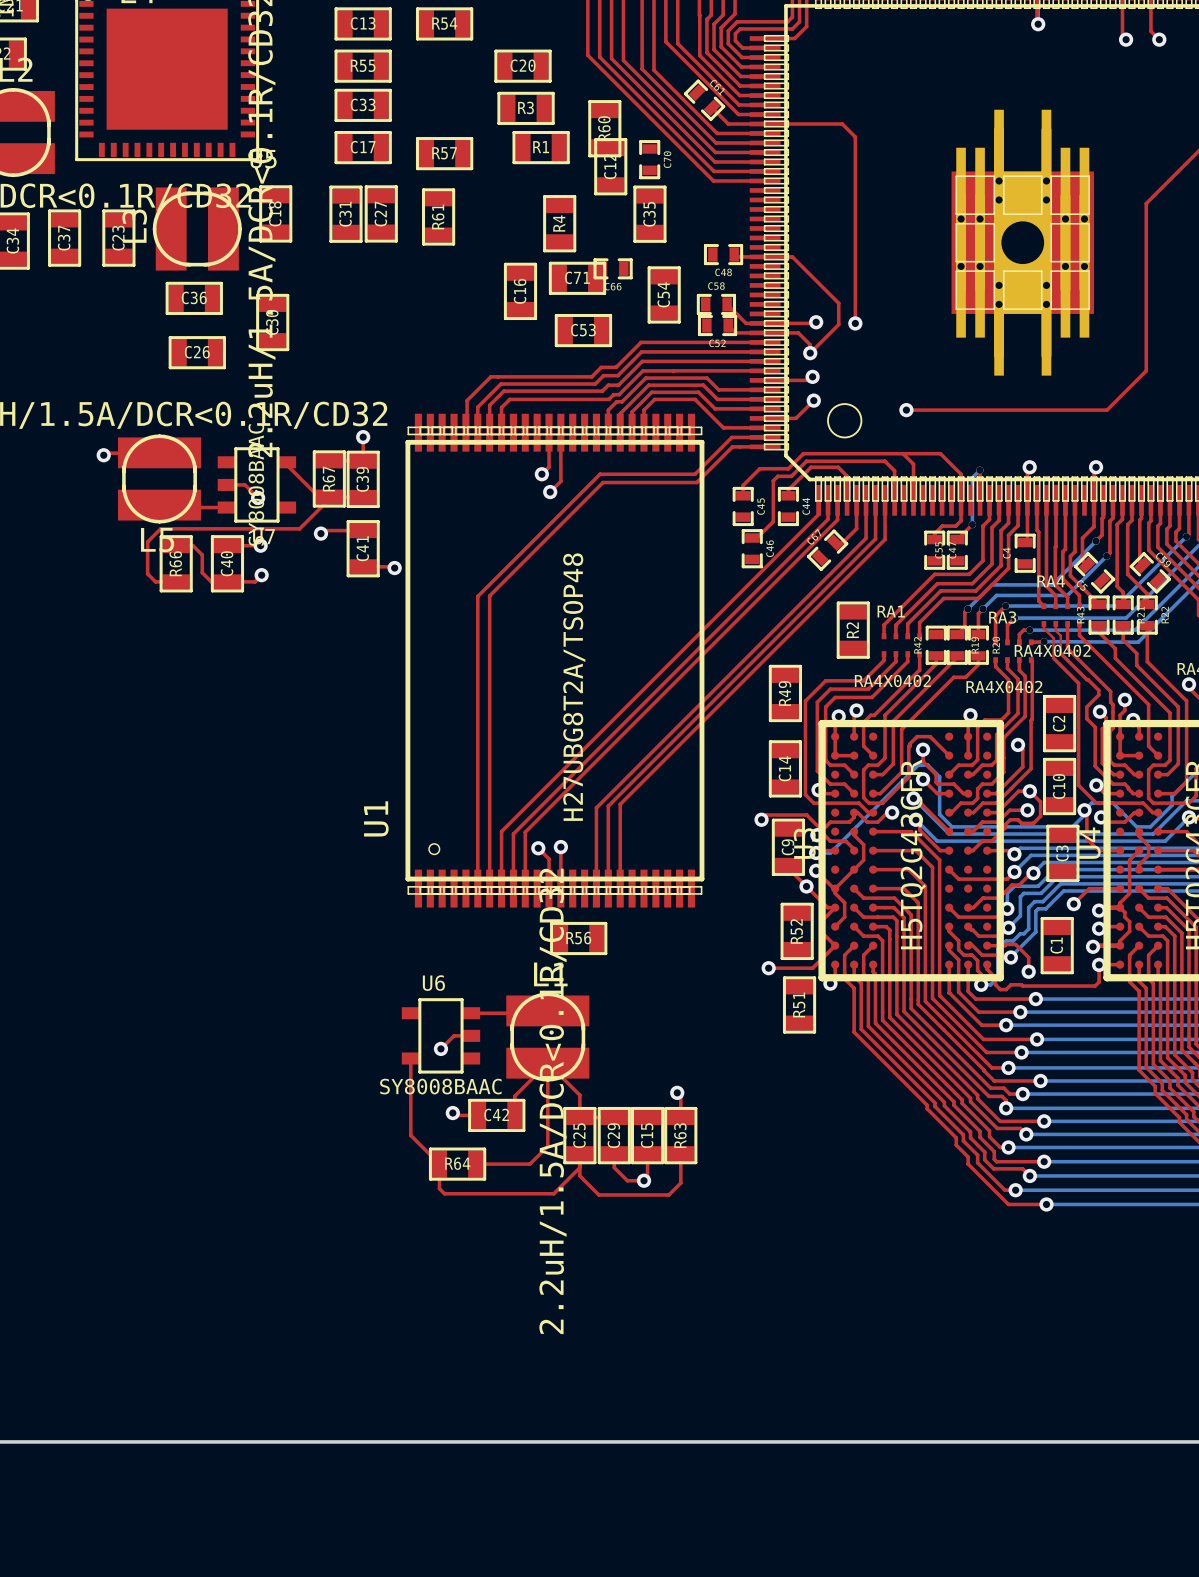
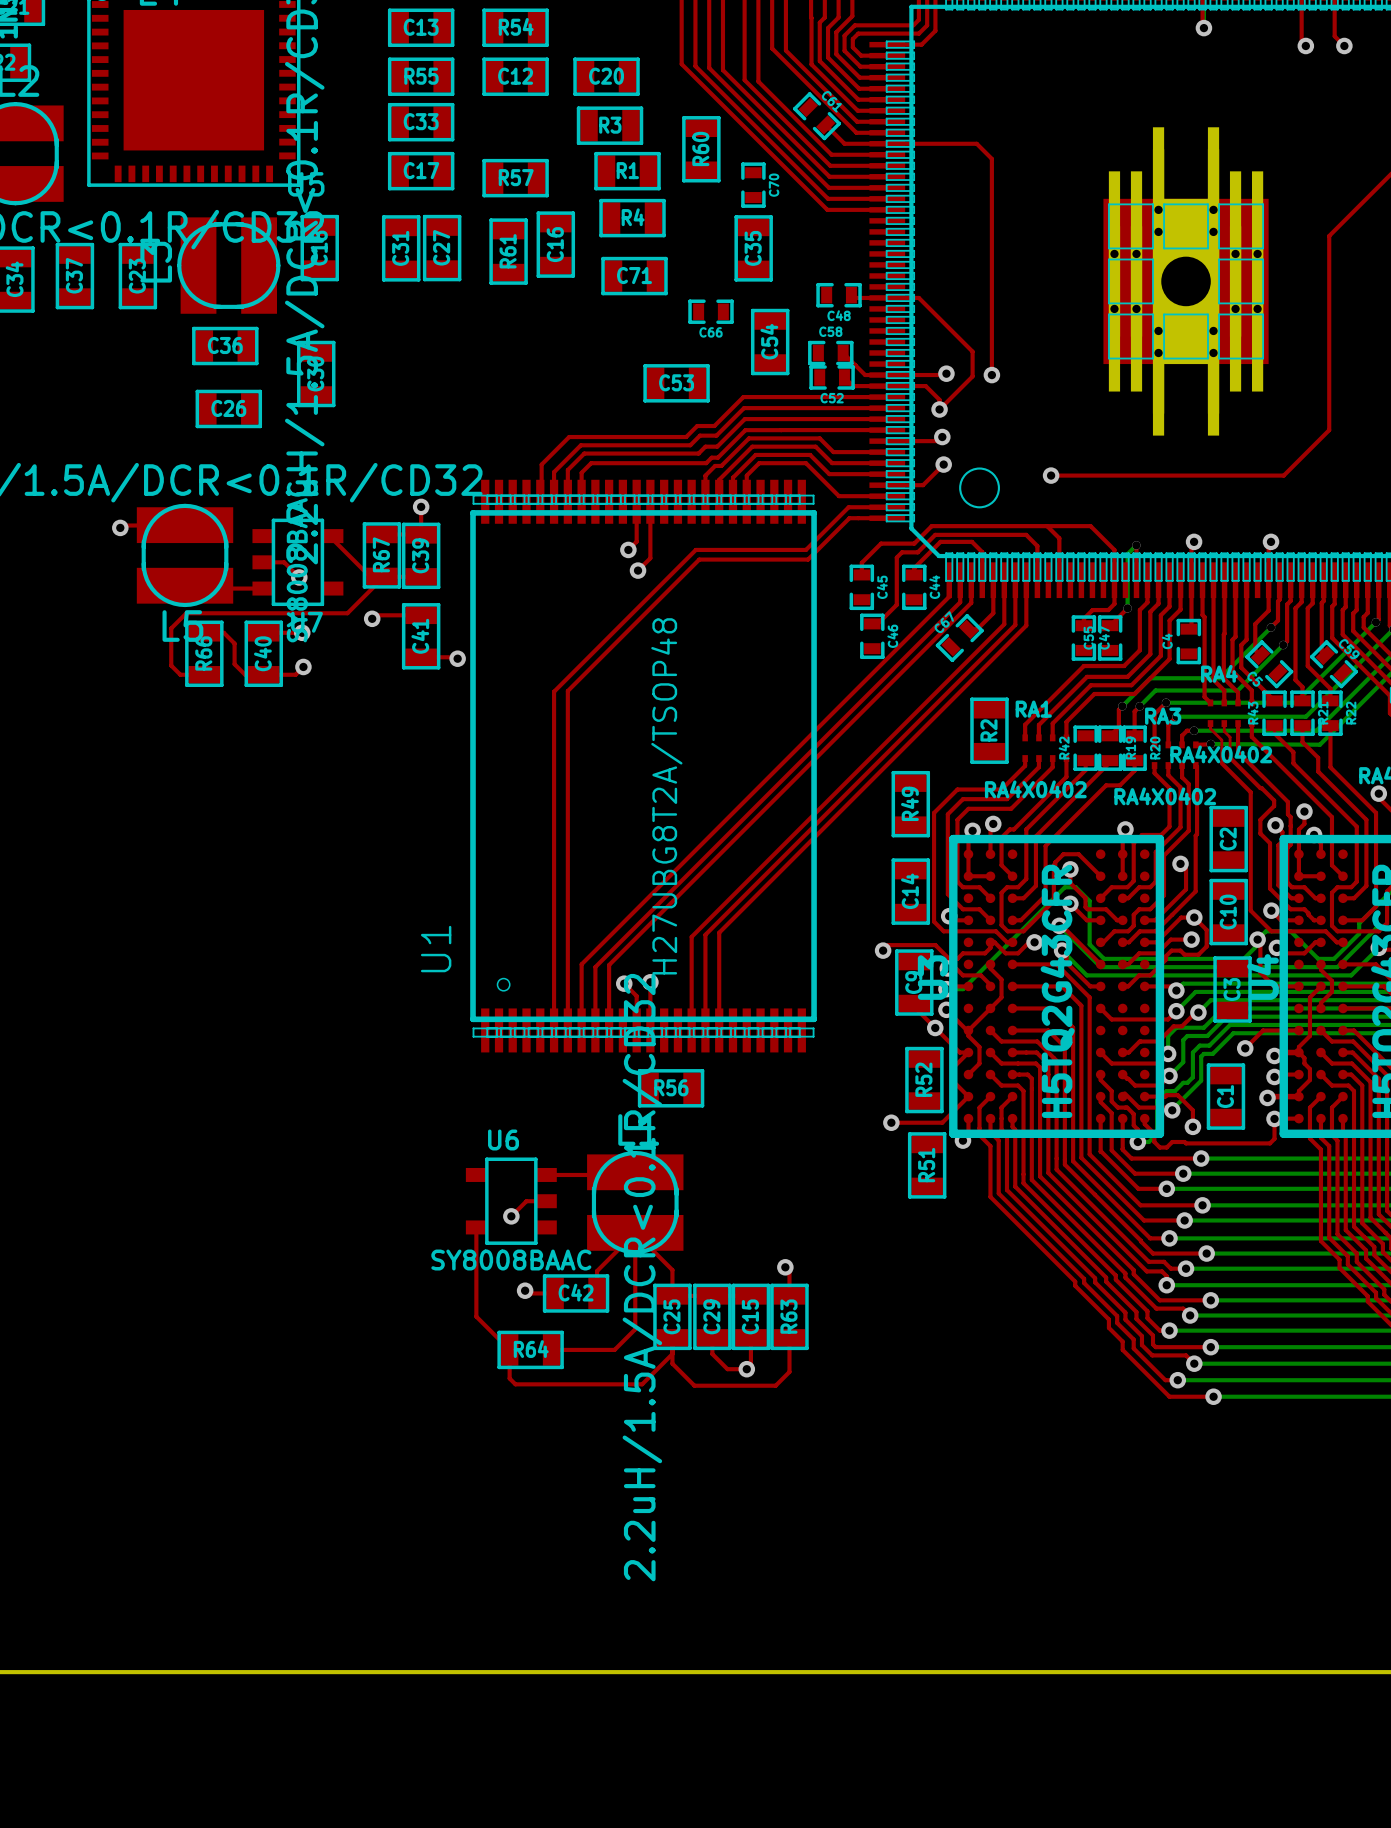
C12 rotation: 0° (610, 166) -> 90° clockwise (515, 76)
C12 position: (610, 166) -> (515, 76)
R4 rotation: 0° (559, 223) -> 90° clockwise (632, 218)
R4 position: (559, 223) -> (632, 218)
C71 position: (577, 278) -> (634, 276)
C16 position: (520, 291) -> (555, 244)

